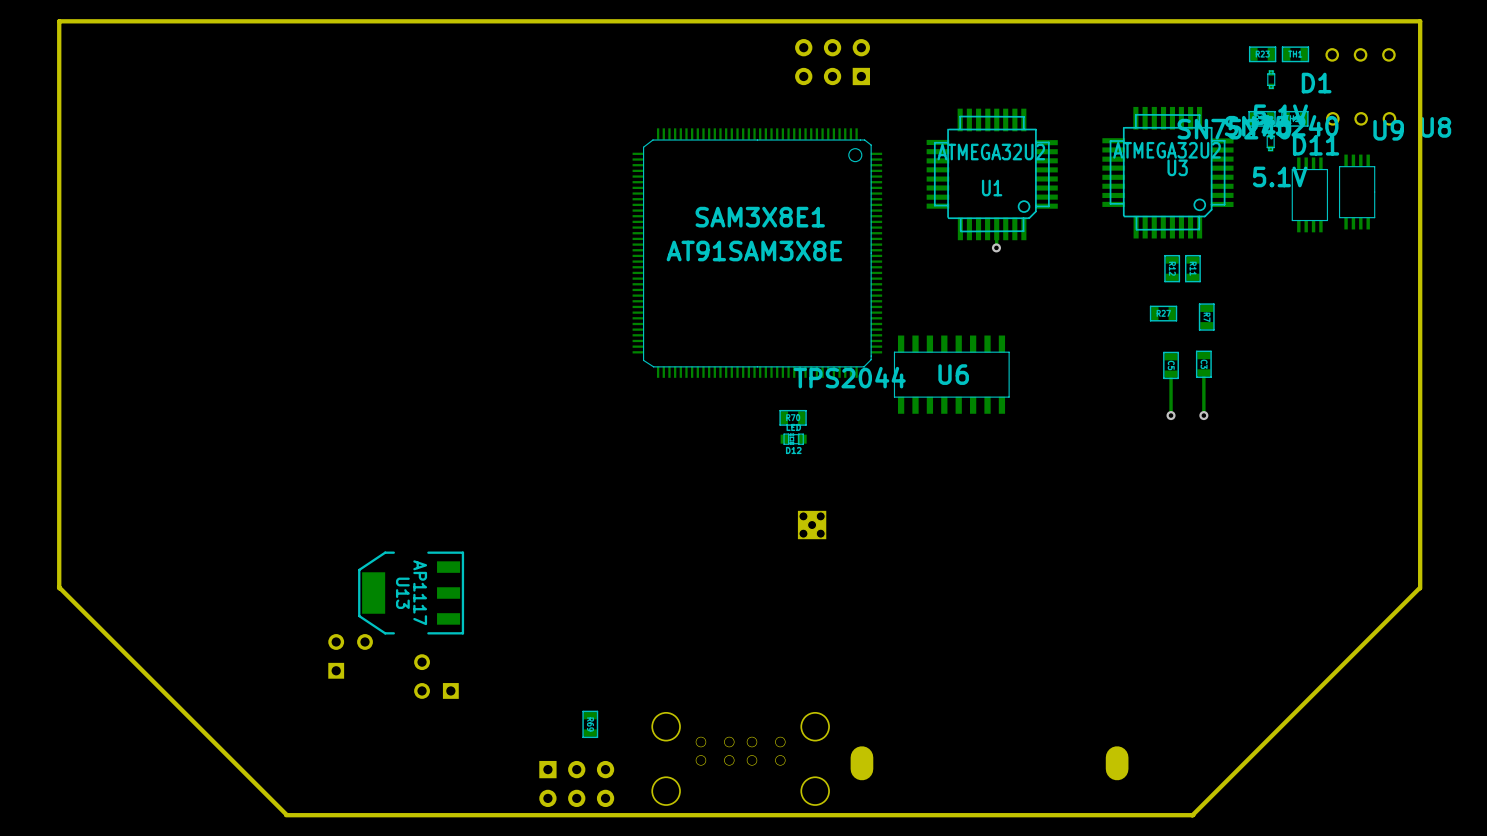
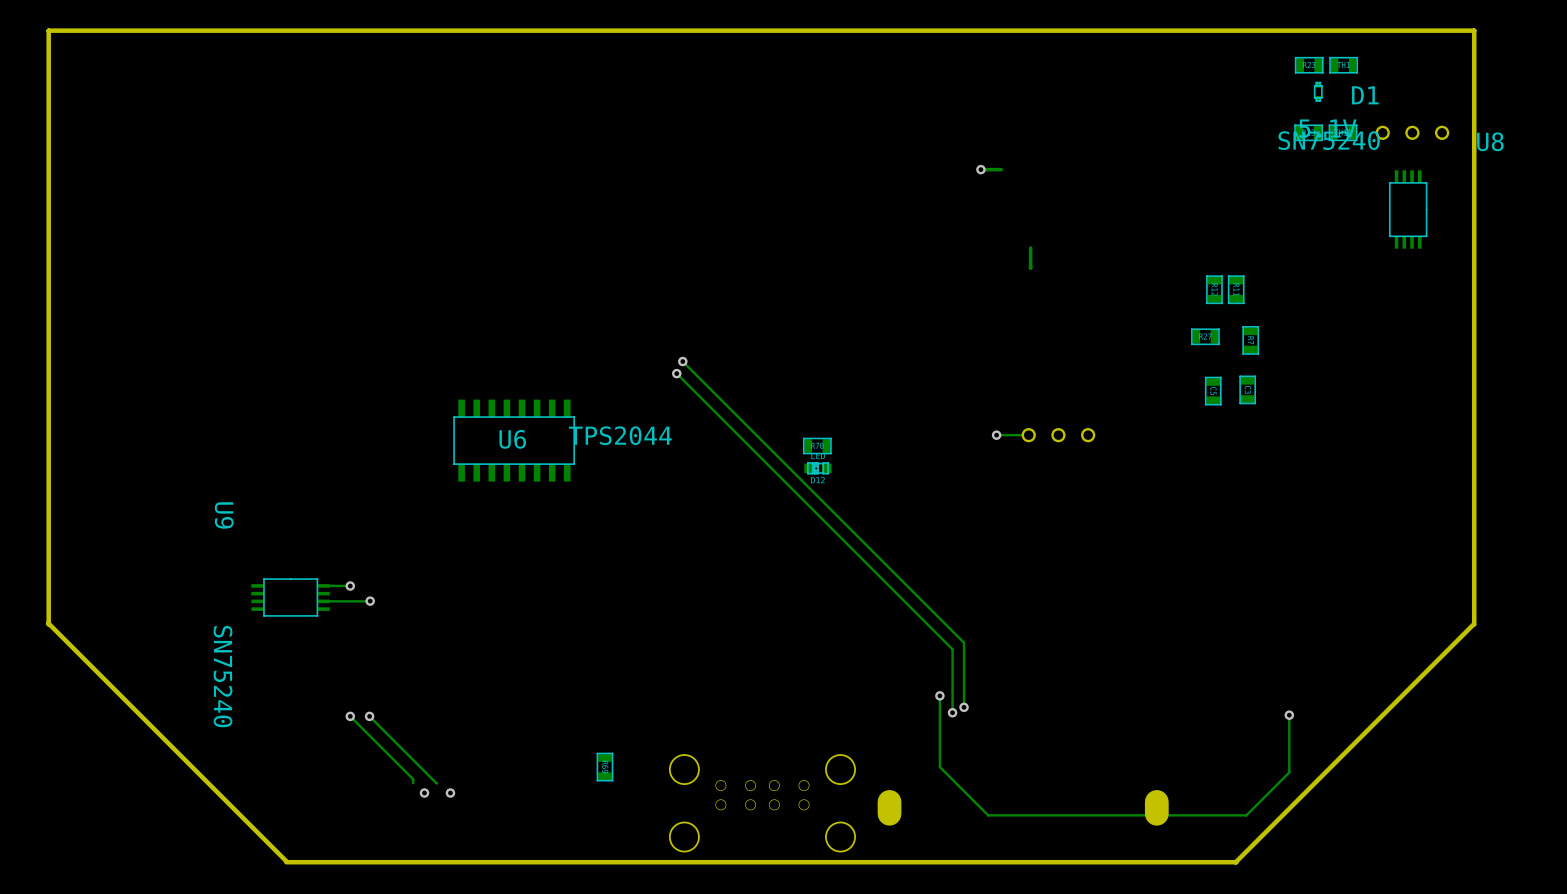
part: (1360, 54) -> none
part: (832, 62) -> none
D11: 5.1V (1270, 141) -> none
via: none -> (980, 169)
track: none -> (1001, 169) (980, 169)
U3: ATMEGA32U2 (1167, 172) -> none
U1: ATMEGA32U2 (992, 174) -> none
U9 rotation: 0° (1309, 194) -> 90° counterclockwise (290, 597)
U9 position: (1309, 194) -> (290, 597)
via: (996, 247) -> none
SAM3X8E1: AT91SAM3X8E (757, 253) -> none
track: none -> (682, 361) (964, 642) (964, 707)
via: none -> (682, 361)
track: none -> (676, 373) (952, 649) (952, 712)
via: none -> (676, 373)
track: (1203, 372) (1203, 415) -> none
U6 rotation: 0° (951, 374) -> 180° (514, 440)
U6 position: (951, 374) -> (514, 440)
track: (1171, 374) (1171, 415) -> none
via: none -> (996, 435)
track: none -> (1033, 435) (996, 435)
part: none -> (1058, 435)
via: (1171, 415) -> none
via: (1203, 415) -> none
part: (812, 525) -> none
track: none -> (350, 585) (323, 585)
via: none -> (350, 586)
track: none -> (370, 601) (323, 601)
via: none -> (370, 601)
U13: AP1117 (411, 593) -> none
part: (350, 656) -> none
track: none -> (939, 695) (939, 767) (988, 815) (1246, 815) (1289, 772) (1289, 715)
via: none -> (939, 695)
via: none -> (964, 707)
via: none -> (952, 712)
via: none -> (1289, 715)
track: none -> (350, 716) (413, 779) (413, 783)
via: none -> (350, 716)
track: none -> (369, 716) (437, 783)
via: none -> (369, 716)
part: (436, 676) -> none
via: none -> (424, 793)
via: none -> (450, 793)
part: (576, 783) -> none

